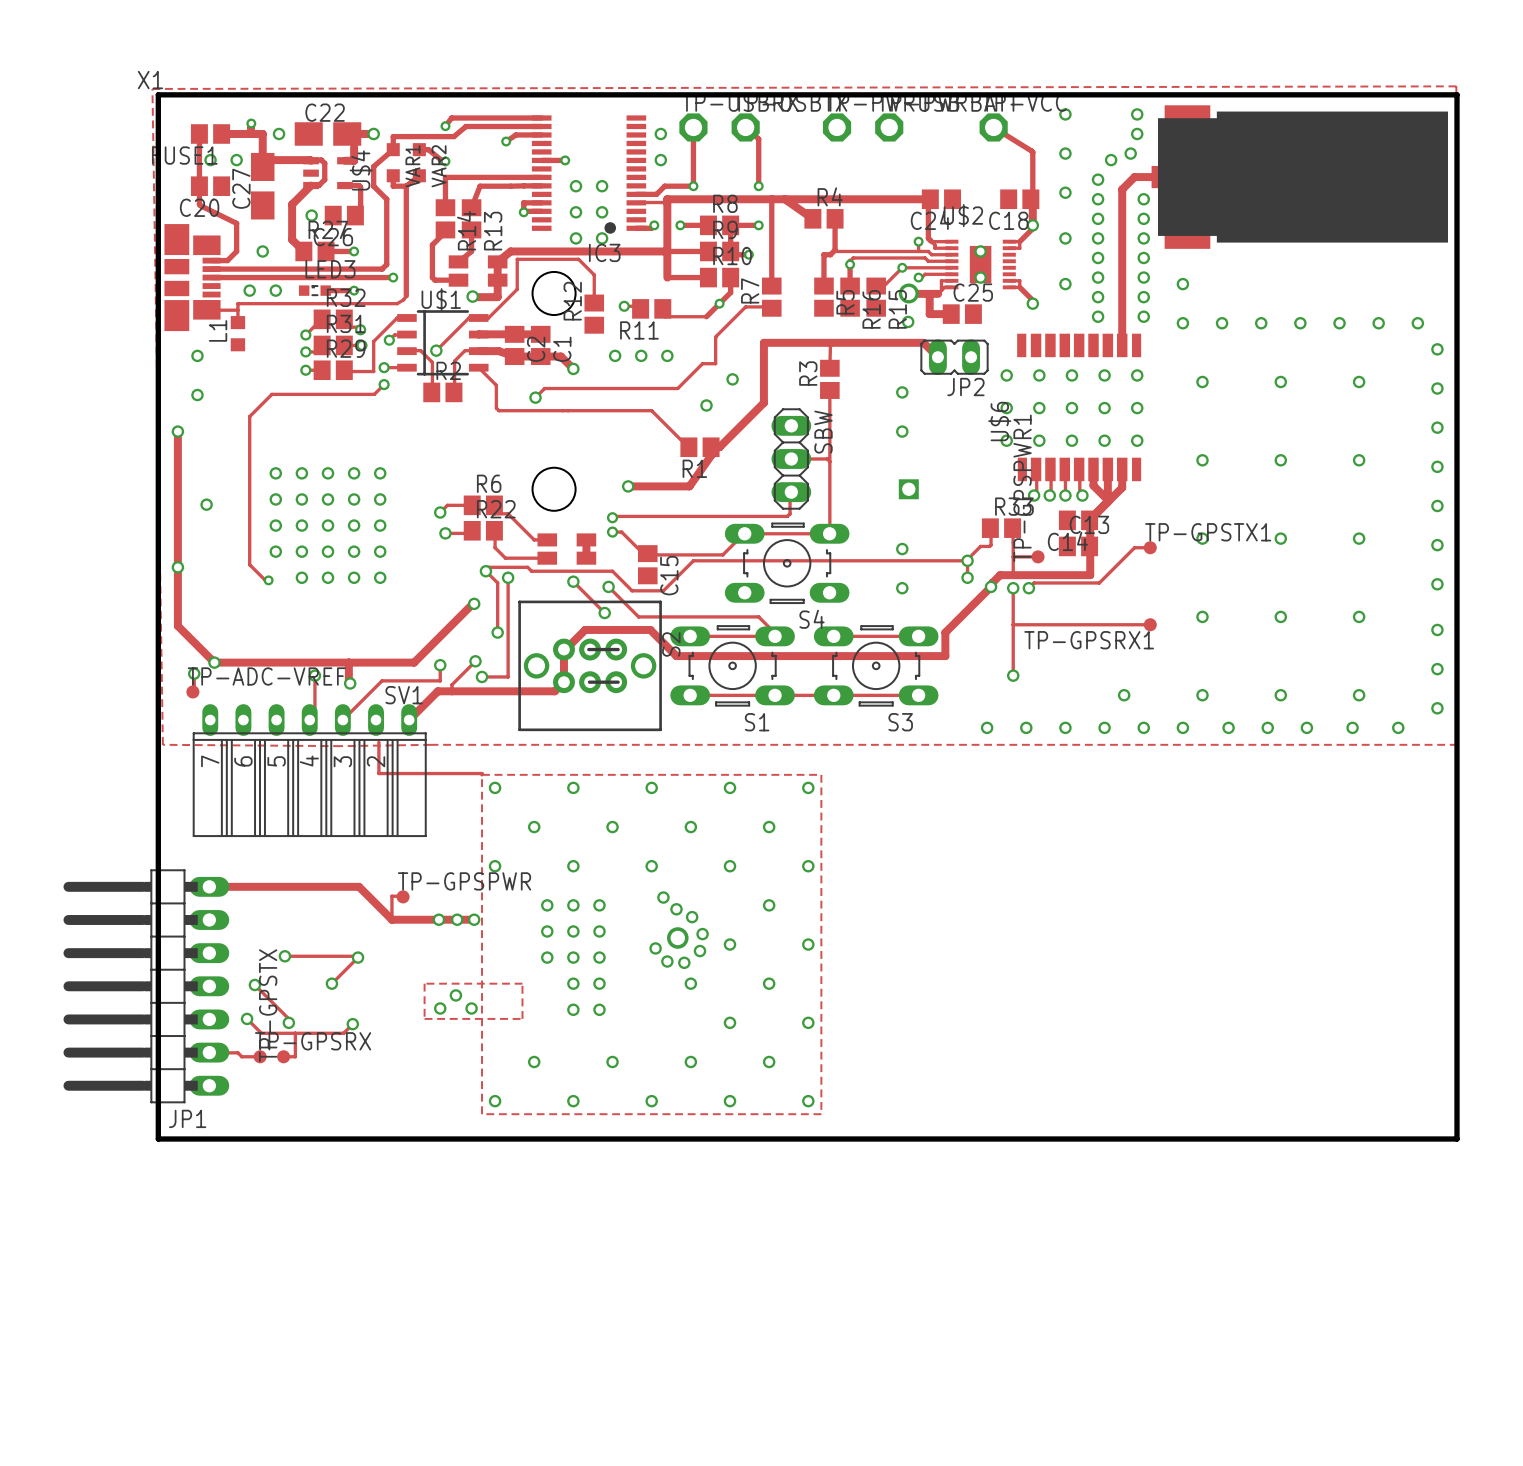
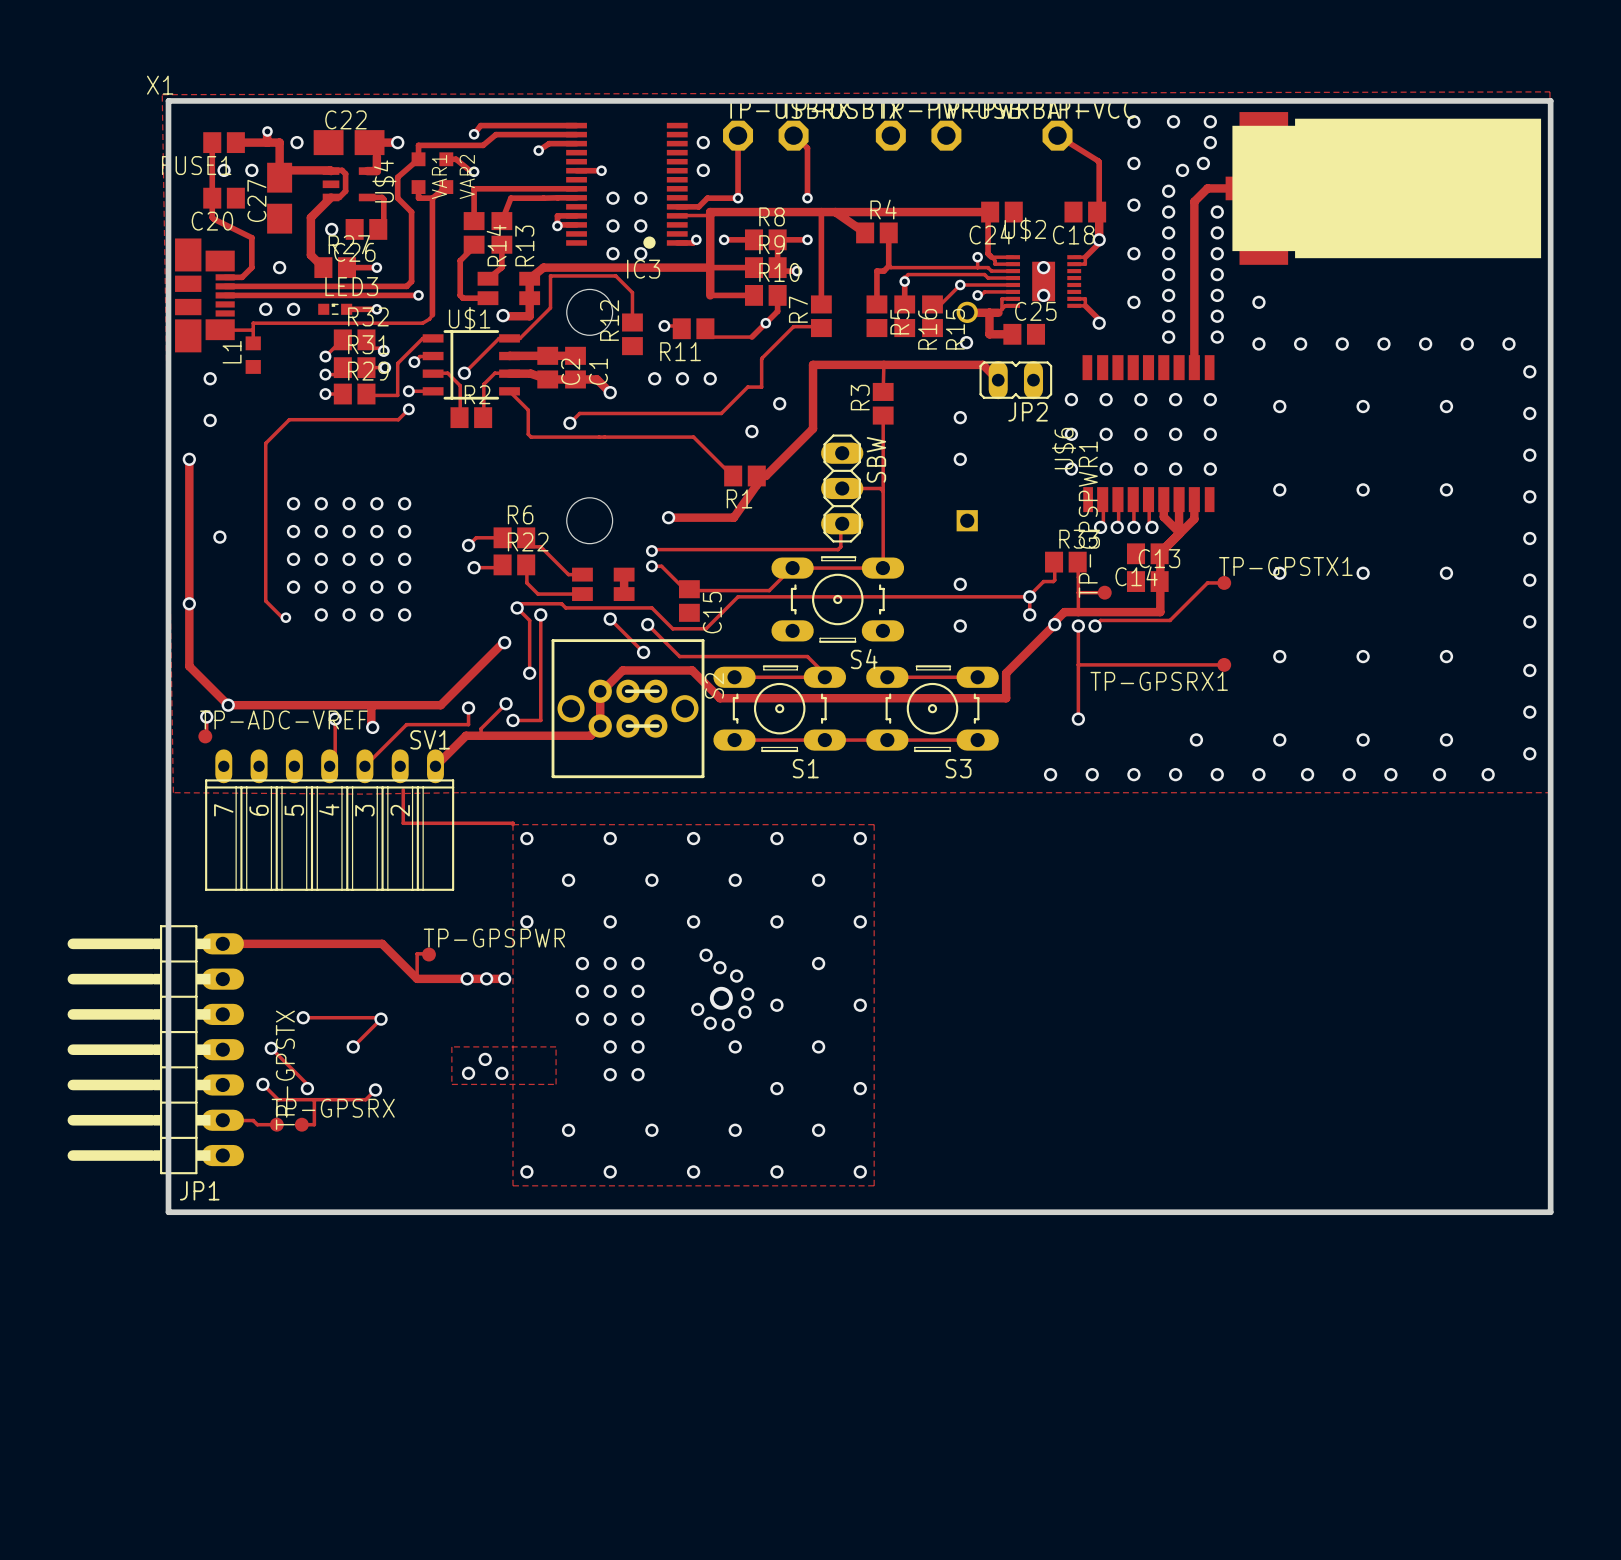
via: none -> (1173, 121)

